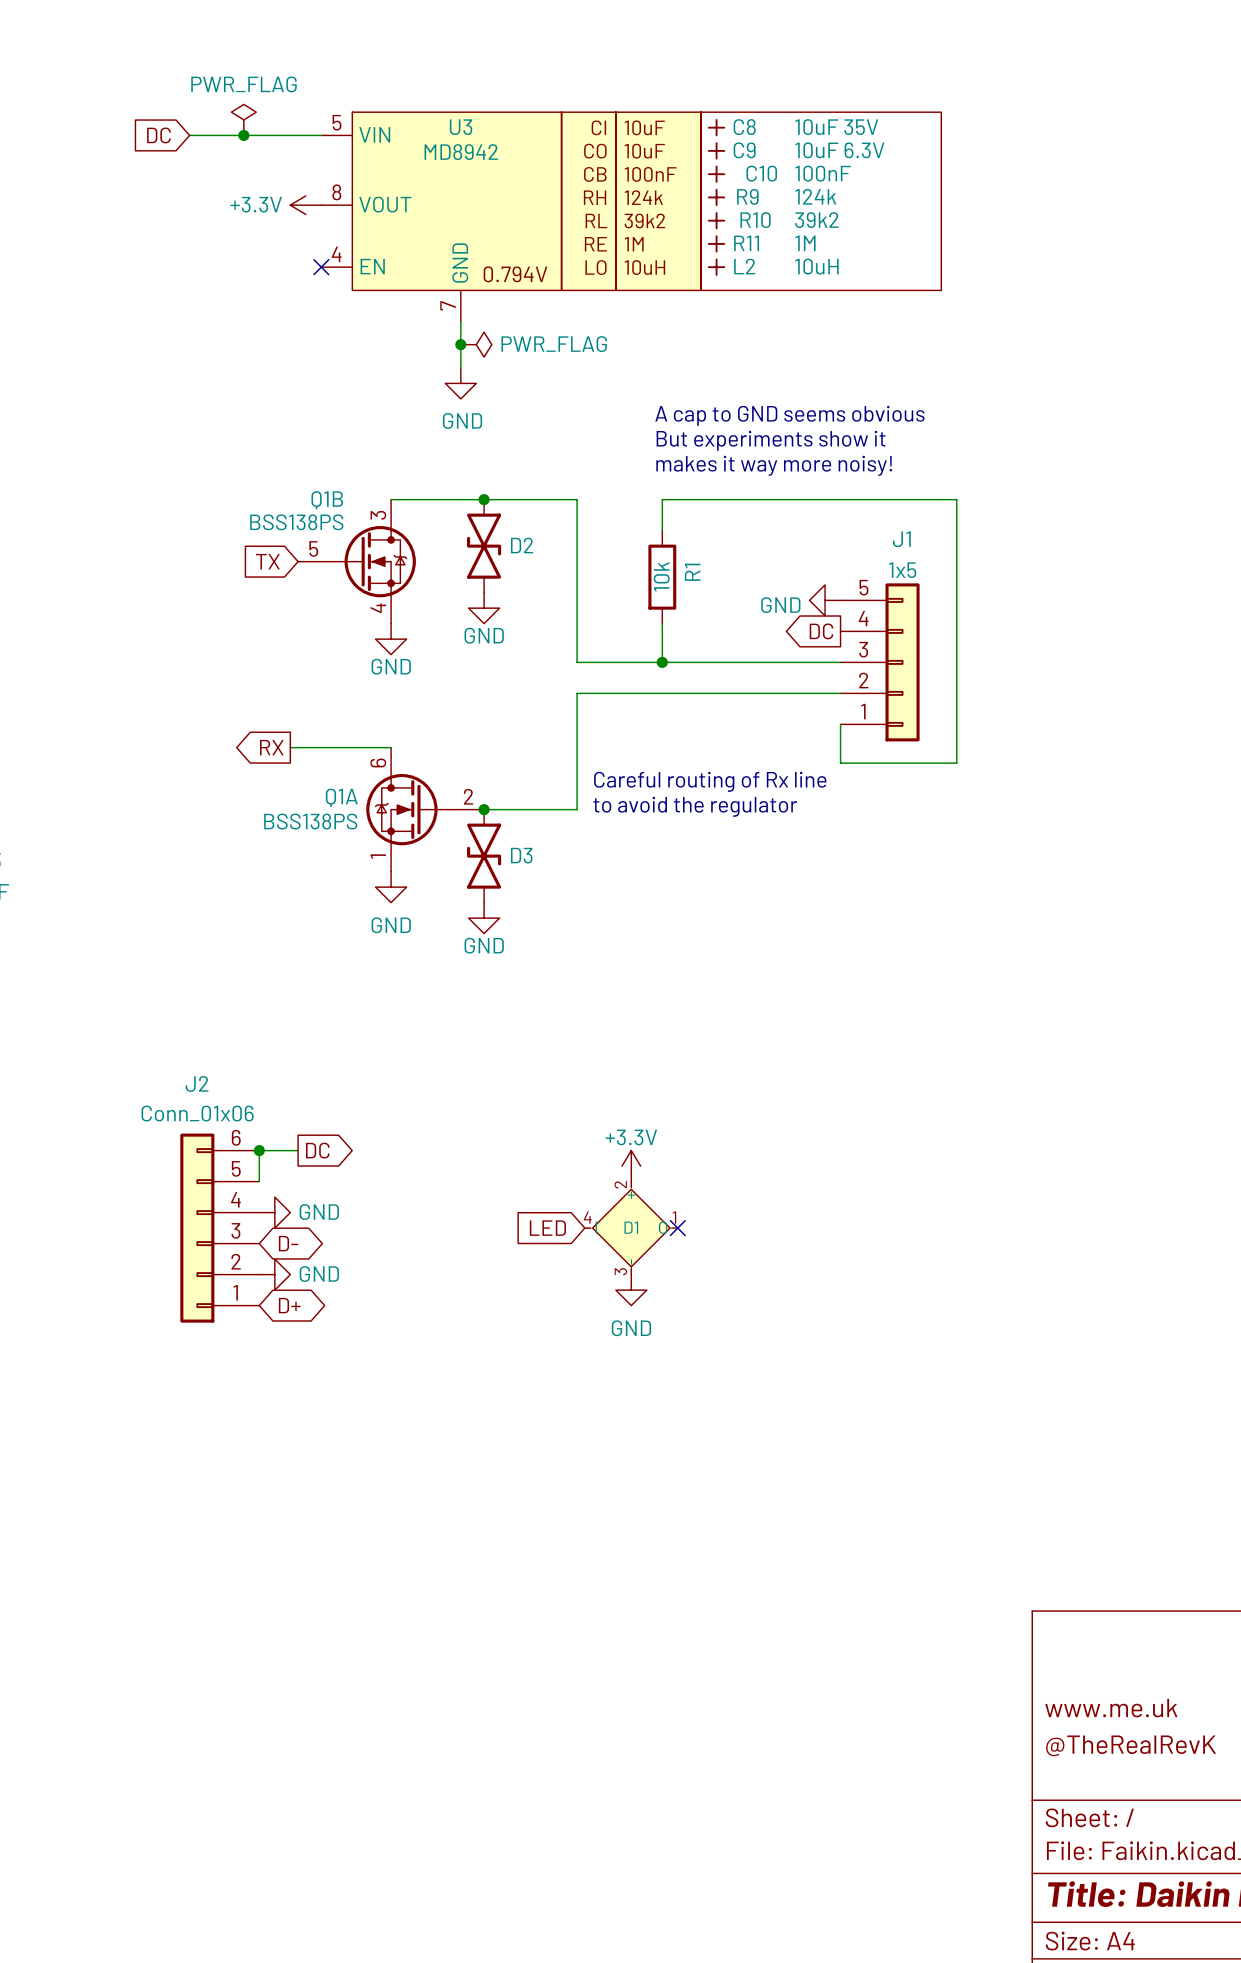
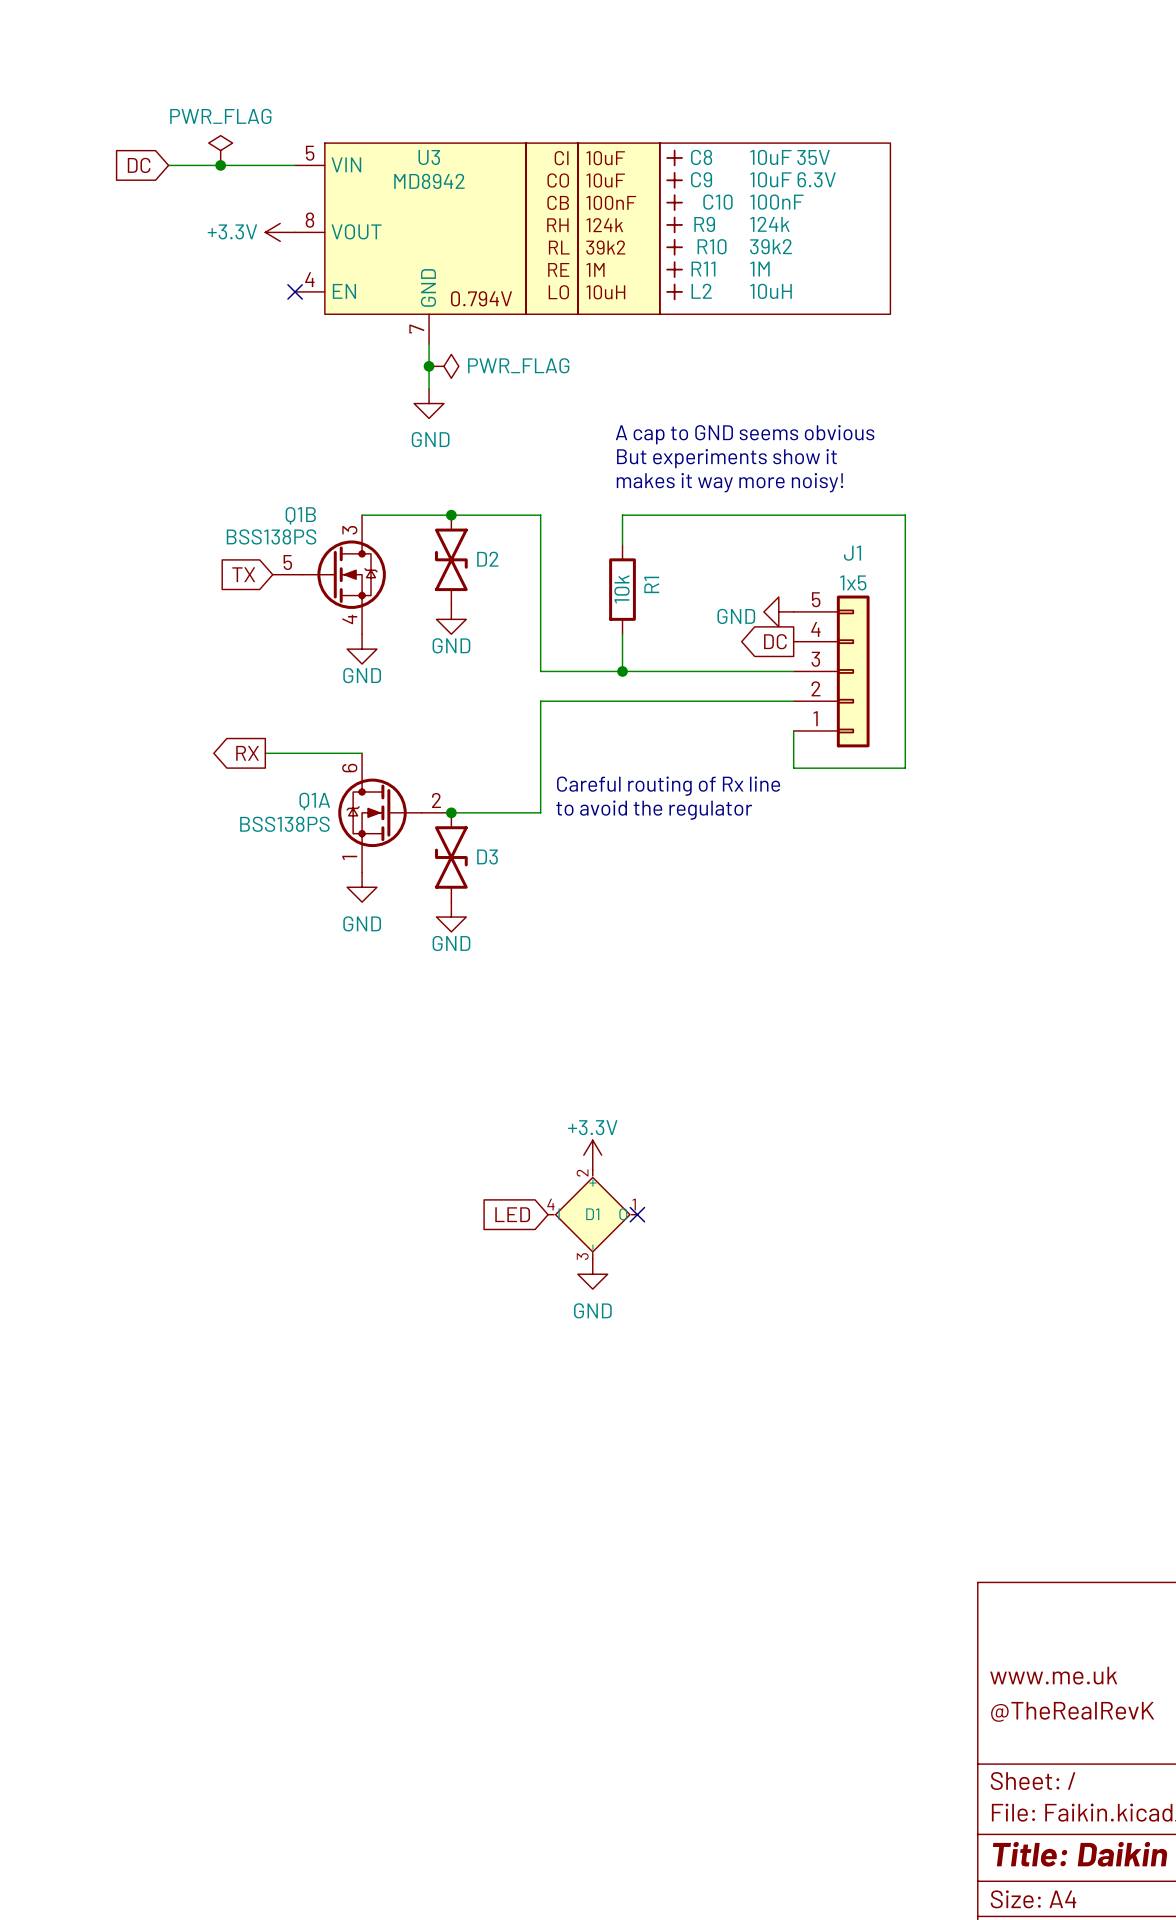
junction: (259, 1150) -> none
wire: (298, 1150) (259, 1150) (259, 1181) -> none
global label: DC (317, 1150) -> none
power symbol: GND (274, 1212) -> none
J2: Conn_01x06 (219, 1228) -> none
global label: D- (288, 1243) -> none
power symbol: GND (274, 1274) -> none
global label: D+ (289, 1305) -> none

